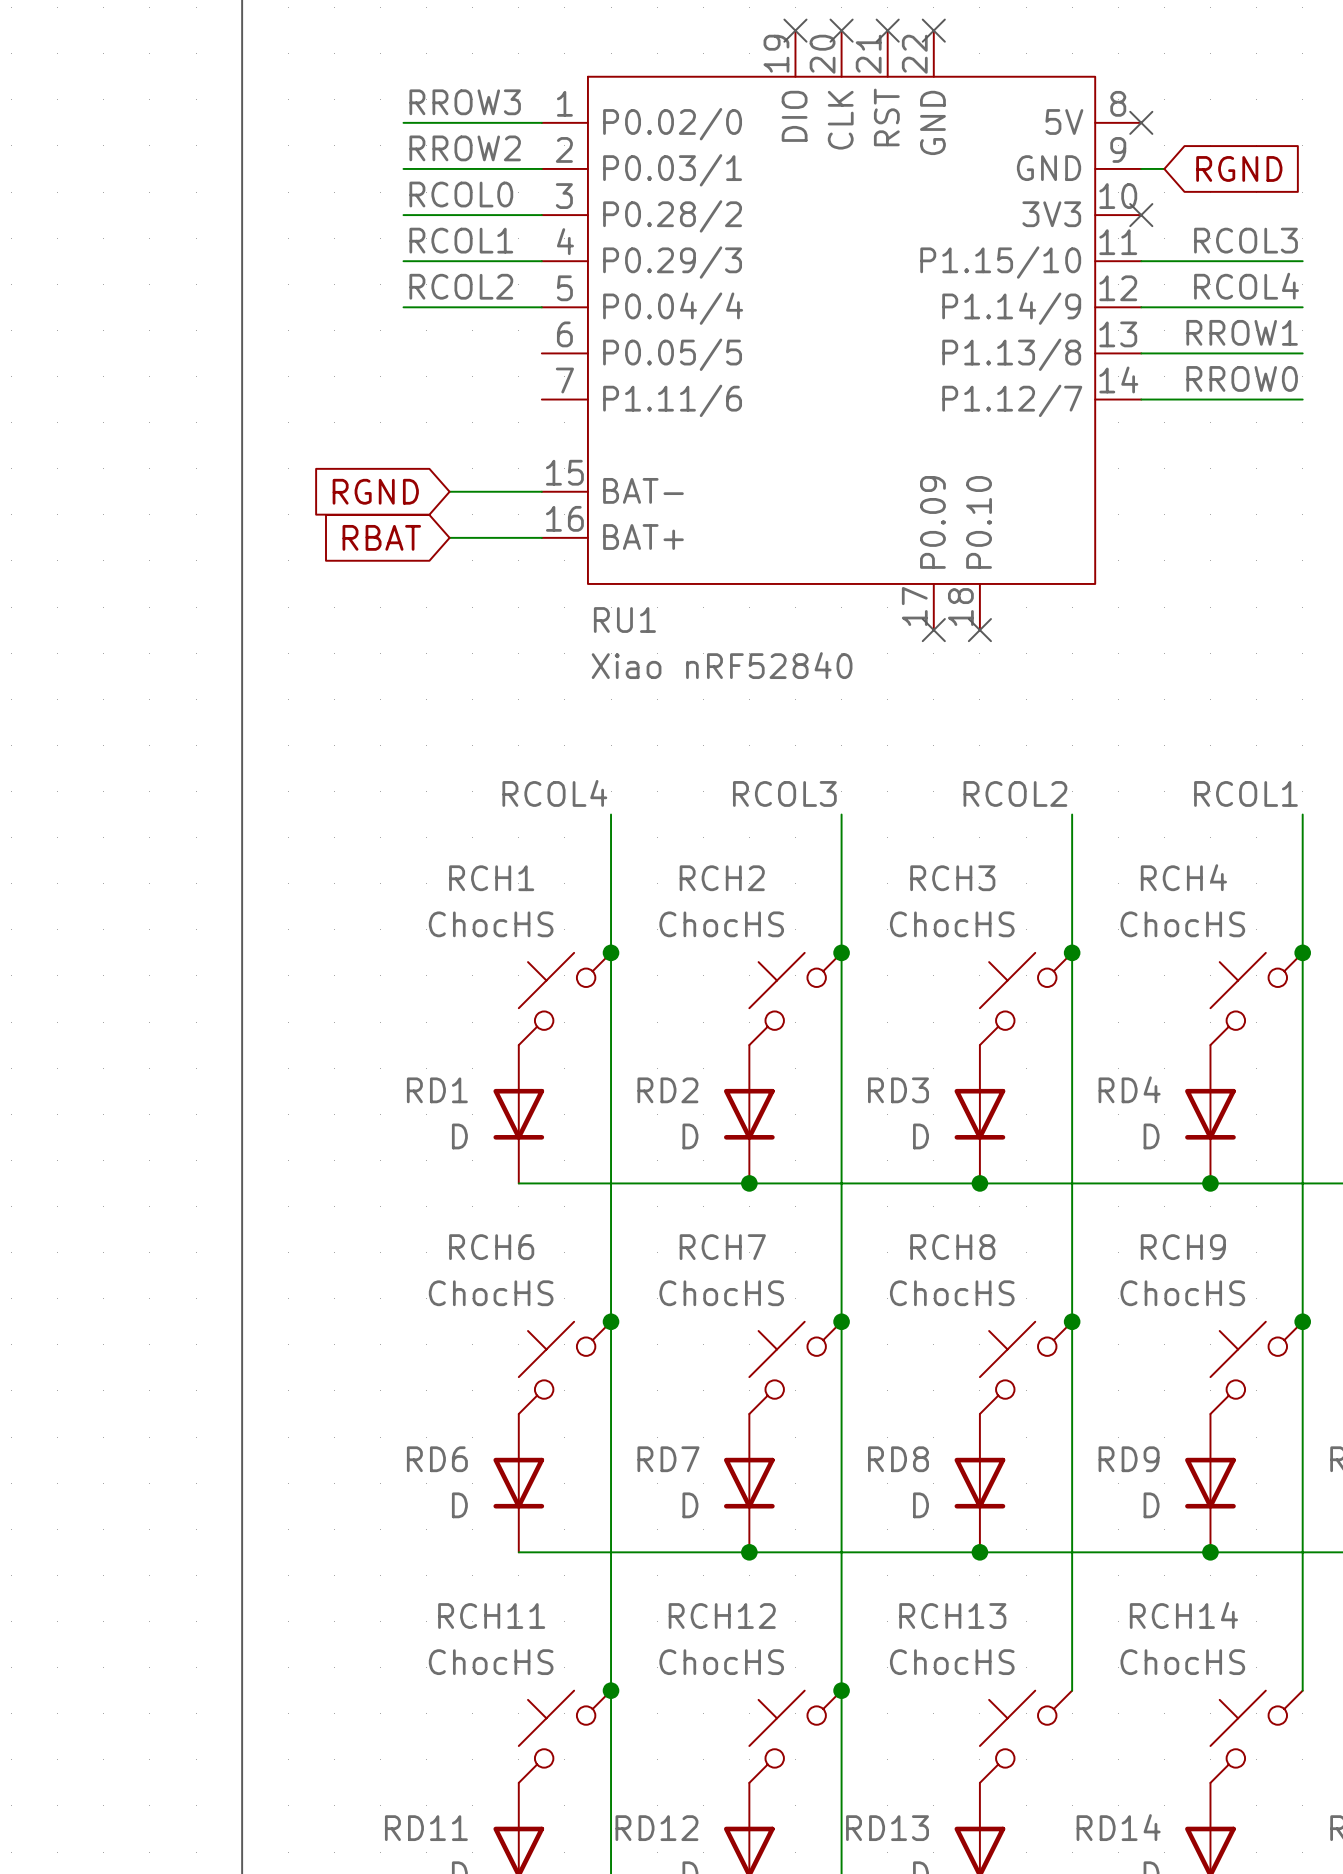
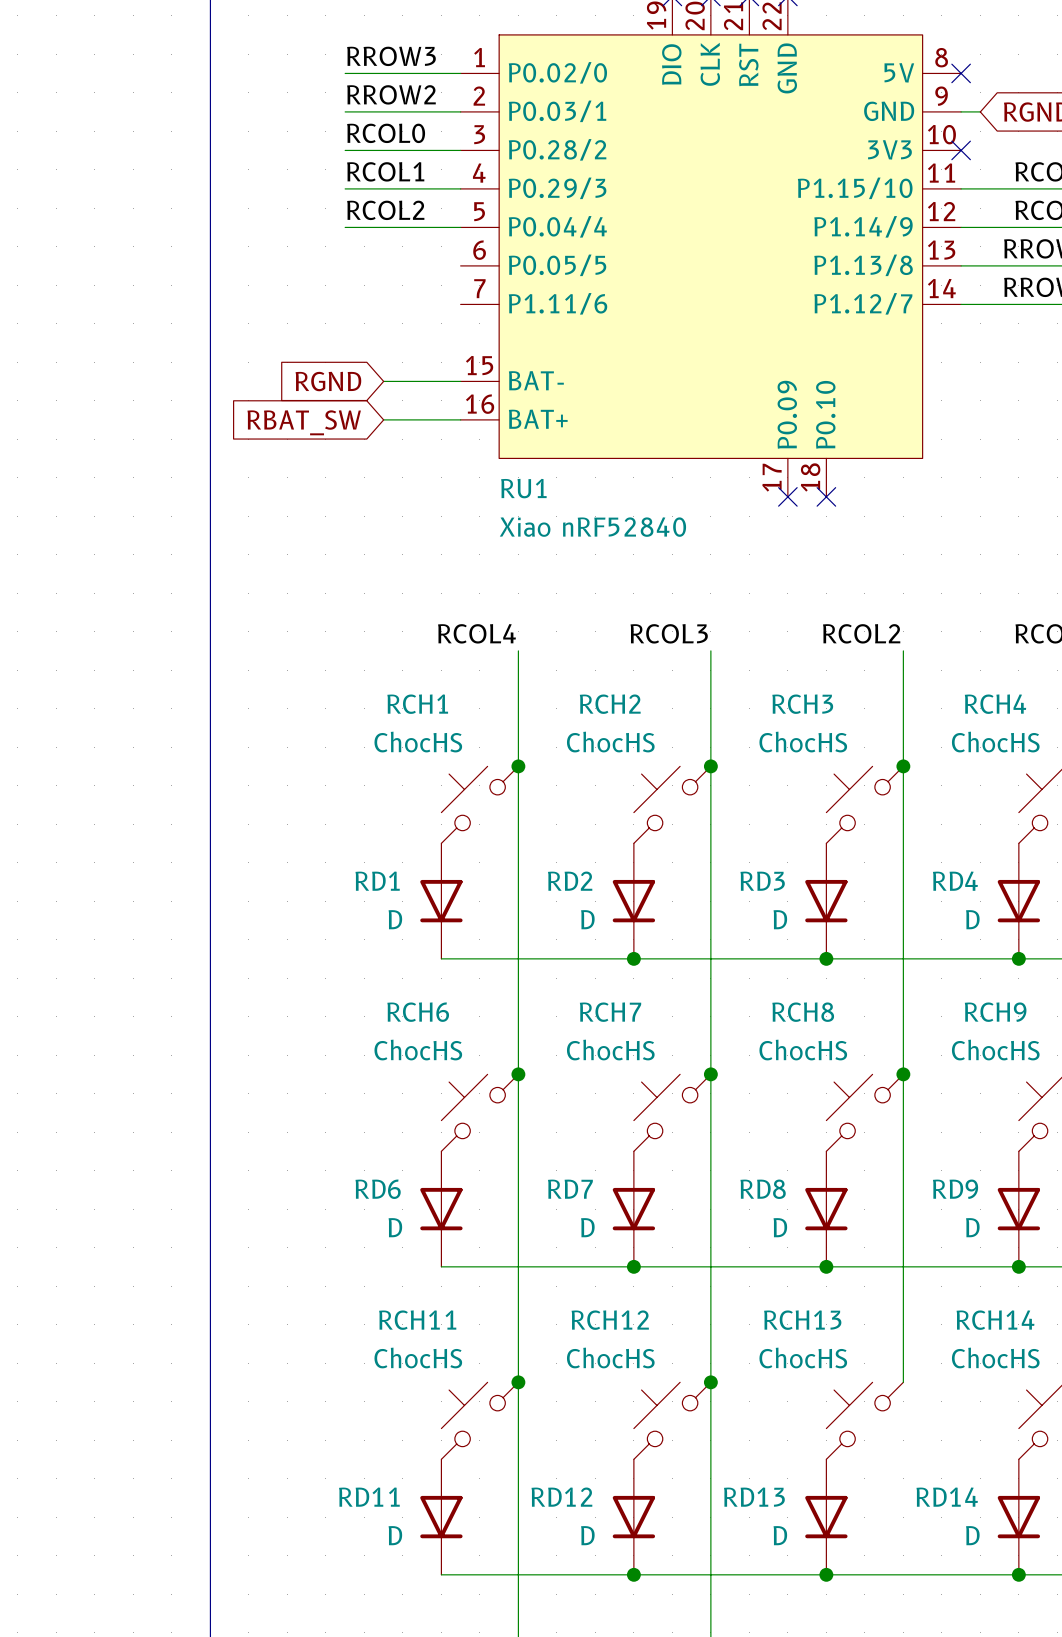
global label: RBAT (381, 537) -> RBAT_SW (304, 422)

